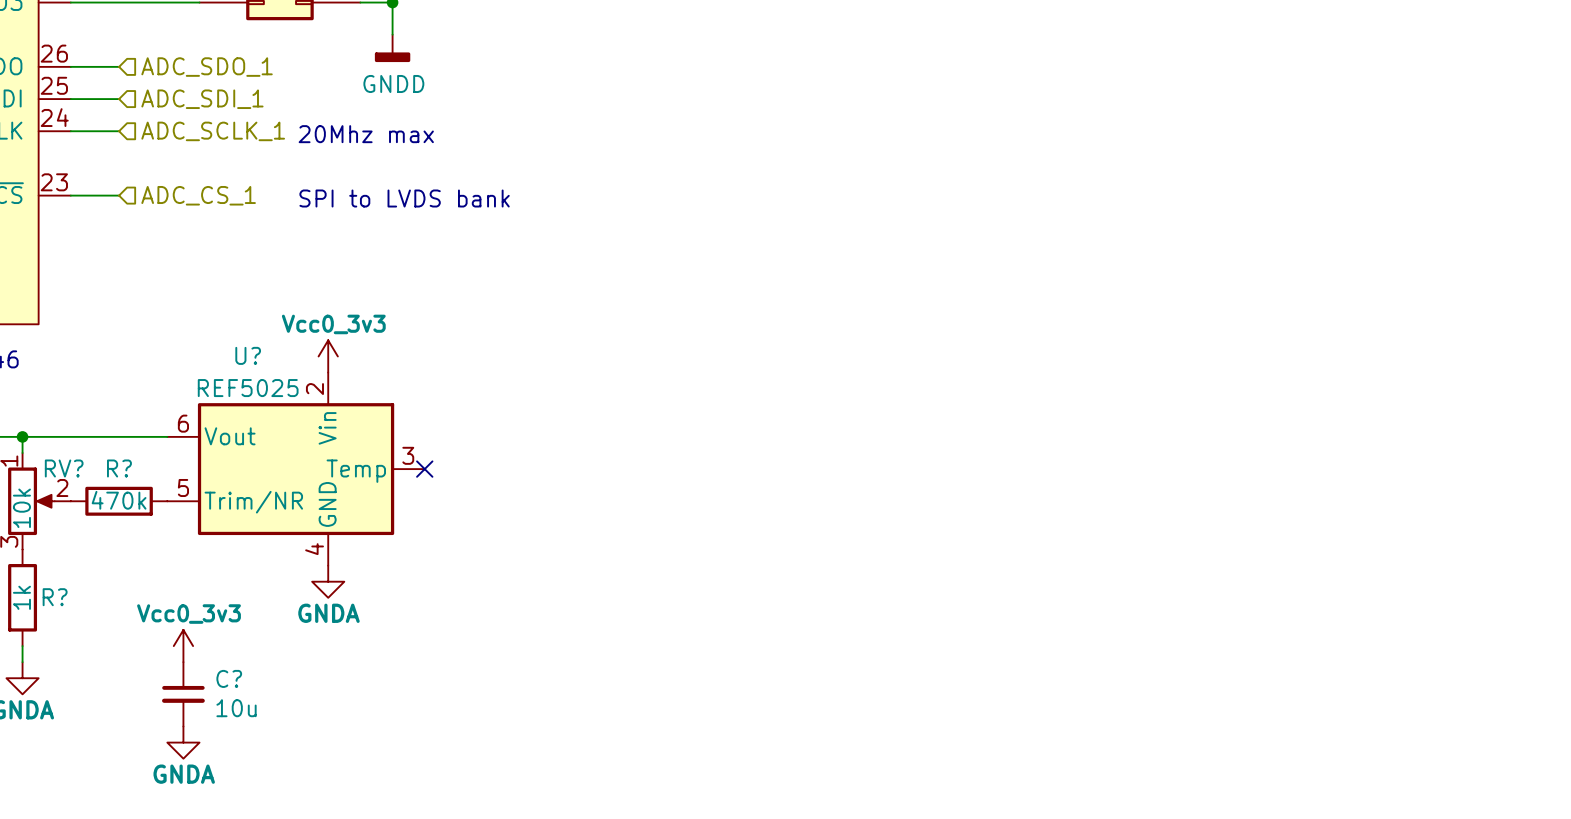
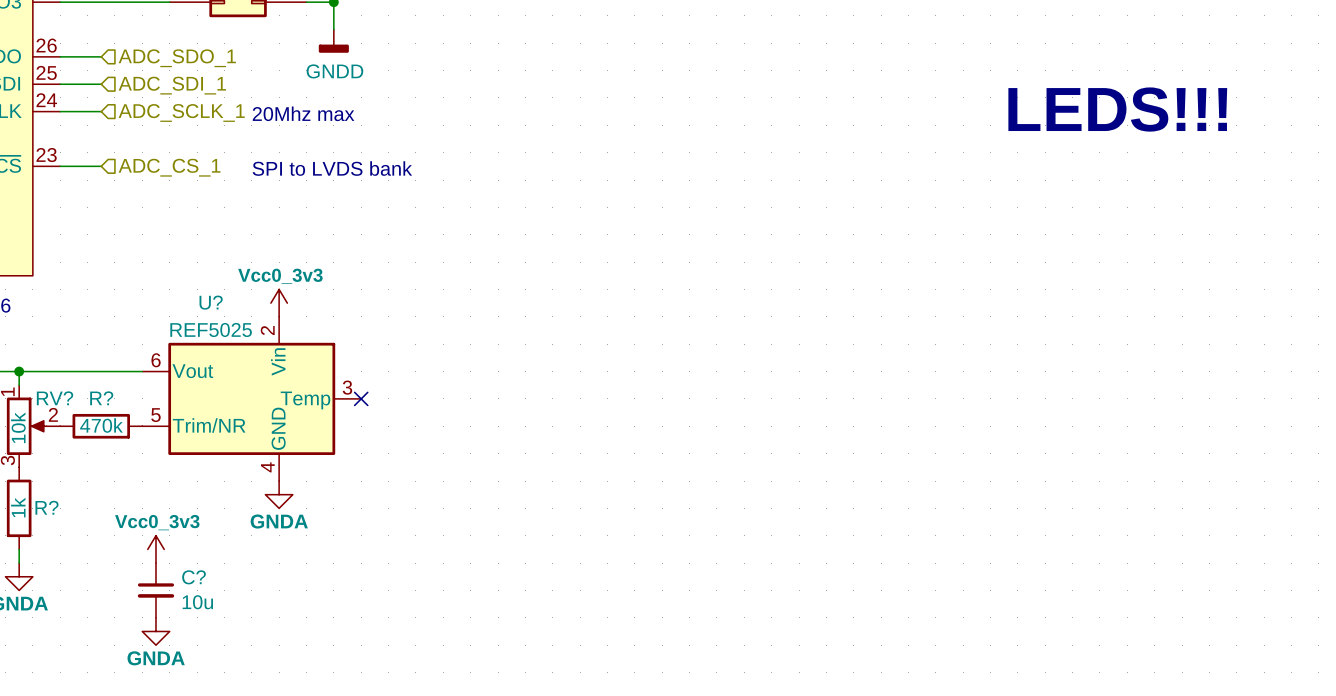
text: none -> LEDS!!! (1117, 109)

